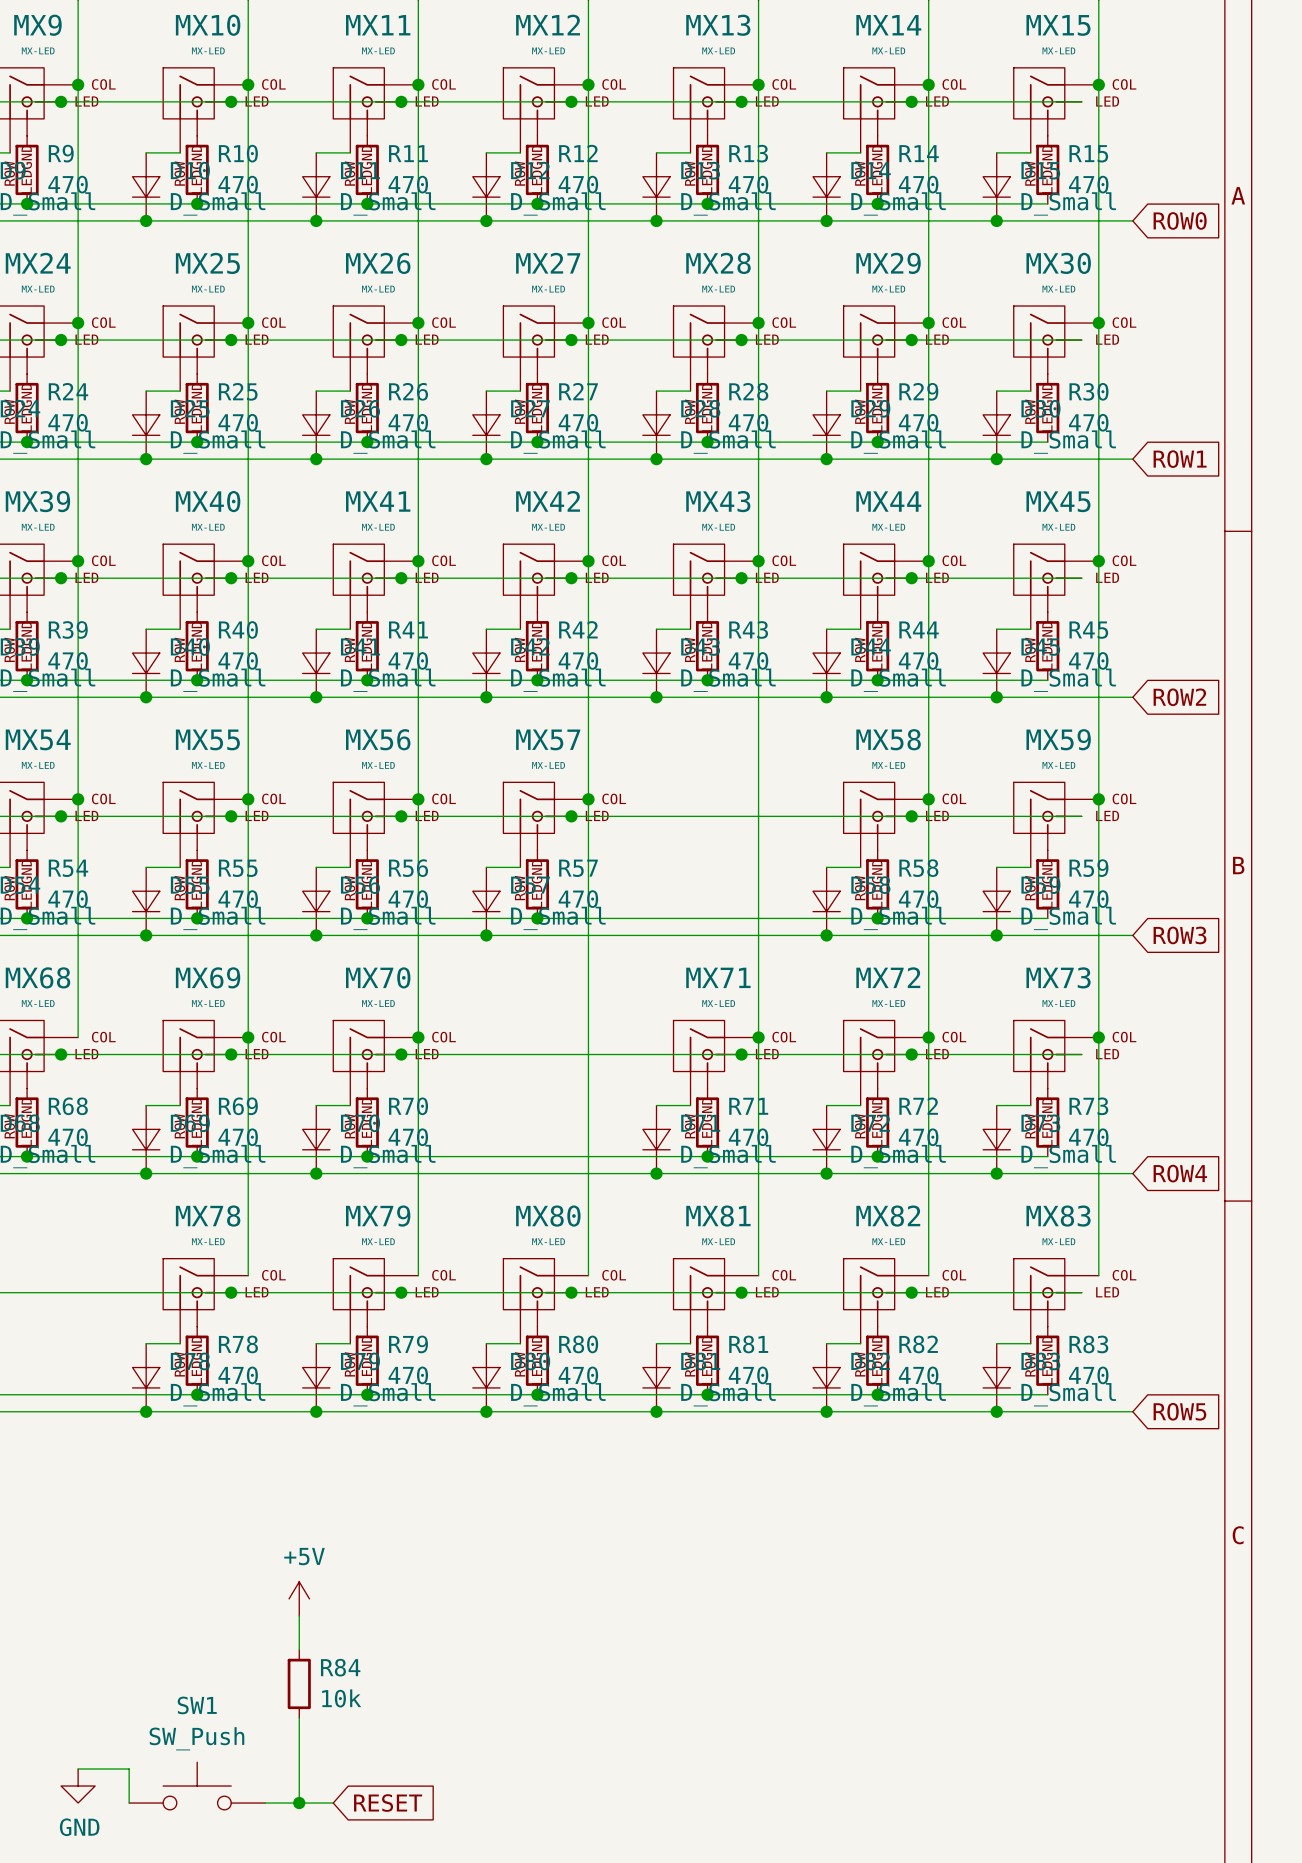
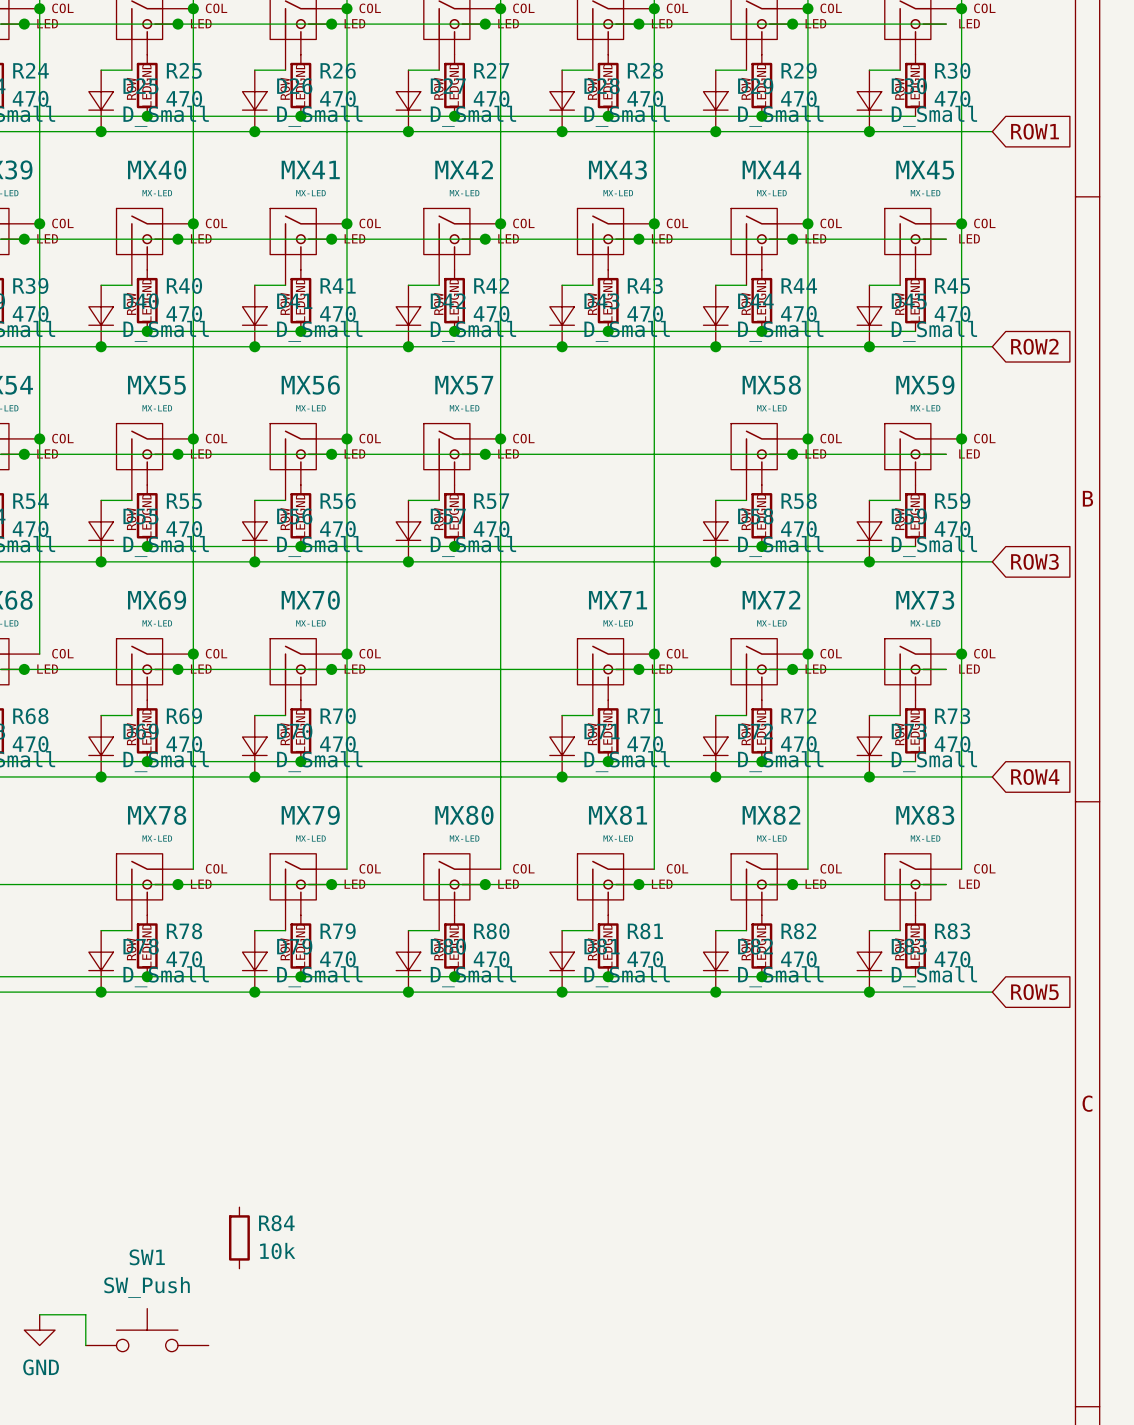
power symbol: +5V (299, 1598) -> none
wire: (299, 1615) (299, 1649) -> none
wire: (299, 1717) (299, 1803) -> none
wire: (265, 1803) (333, 1803) -> none
junction: (299, 1803) -> none
global label: RESET (388, 1803) -> none

